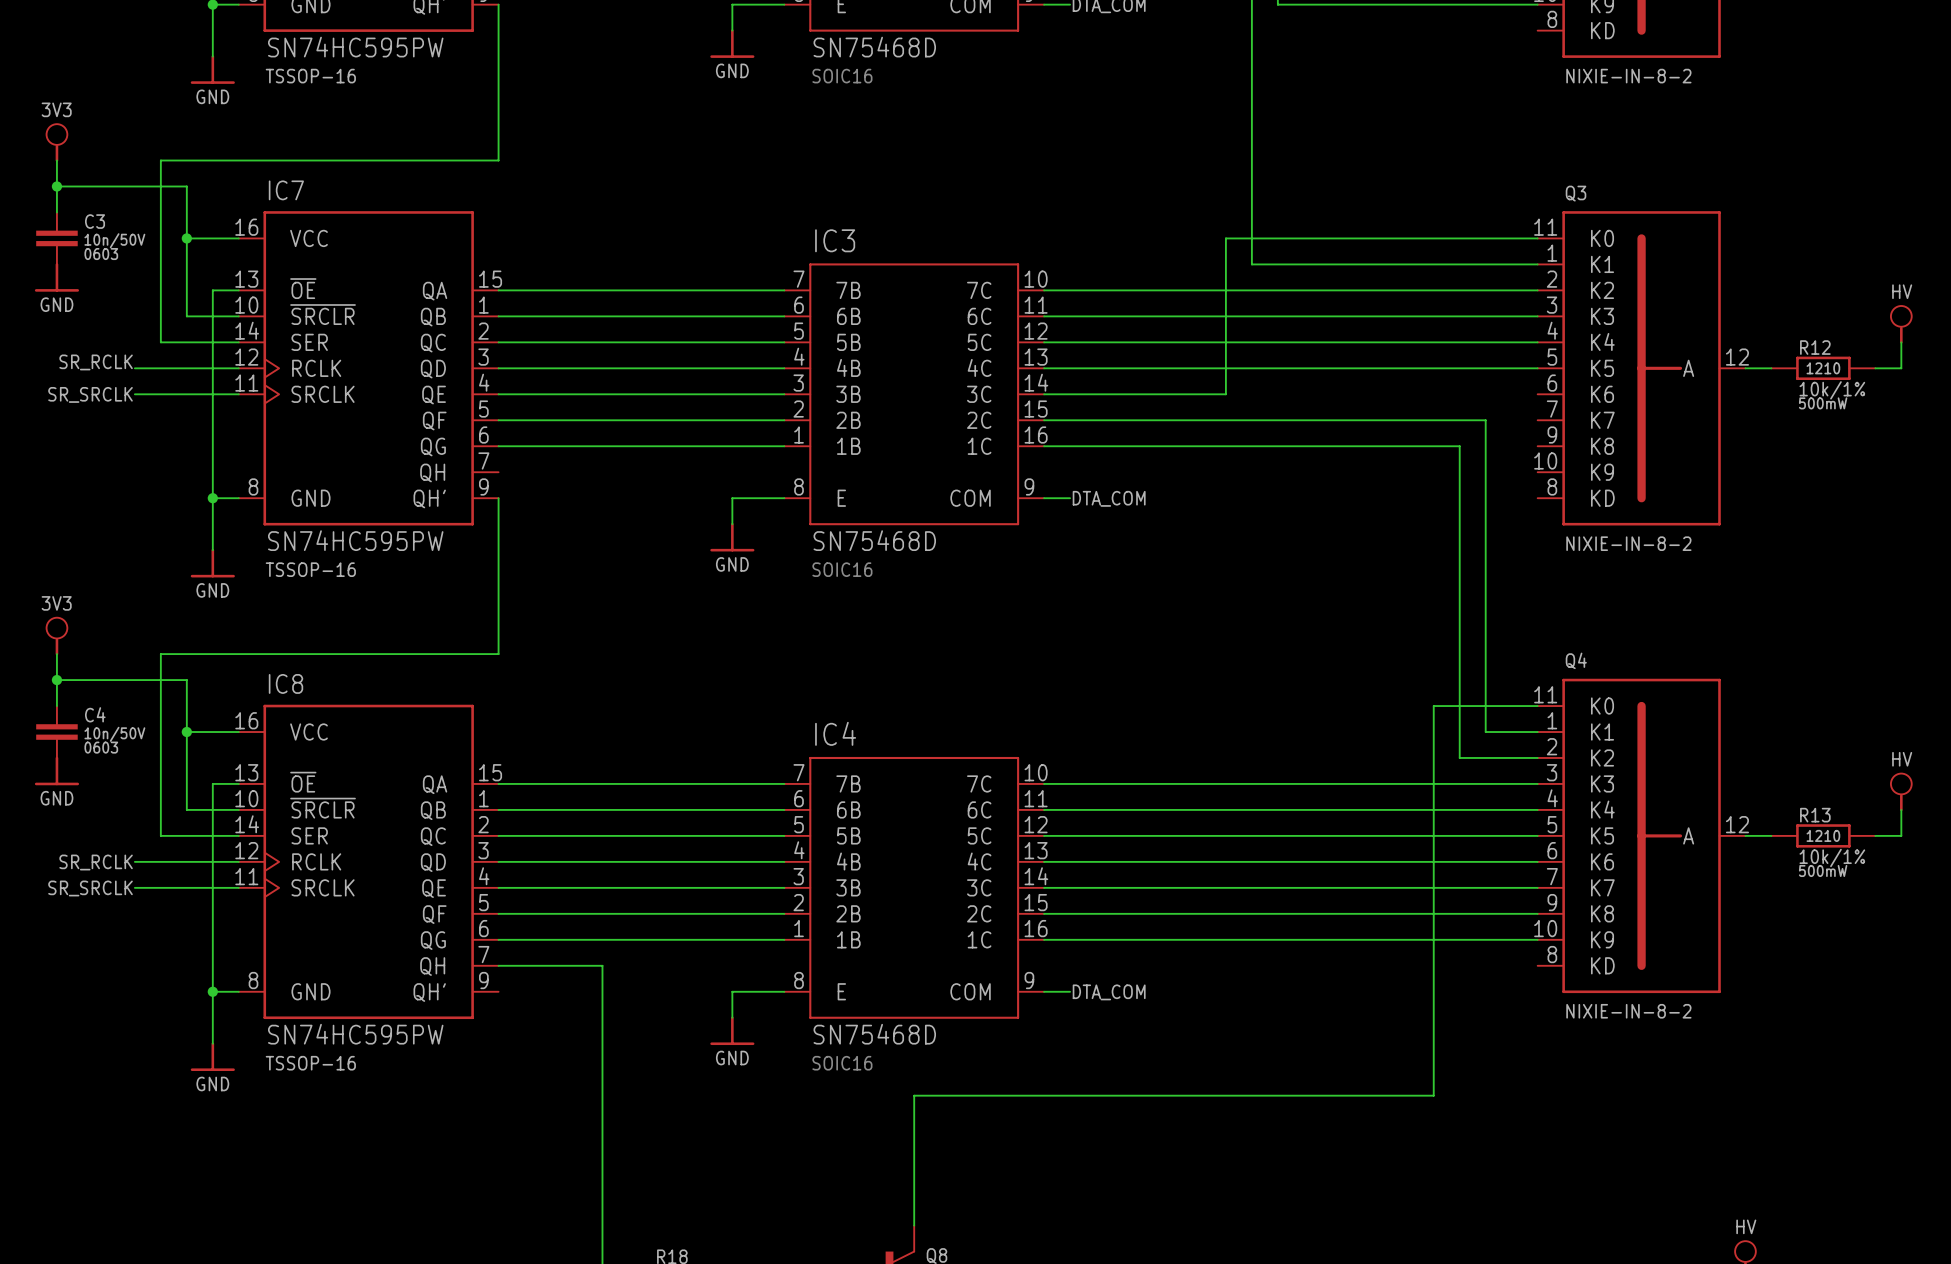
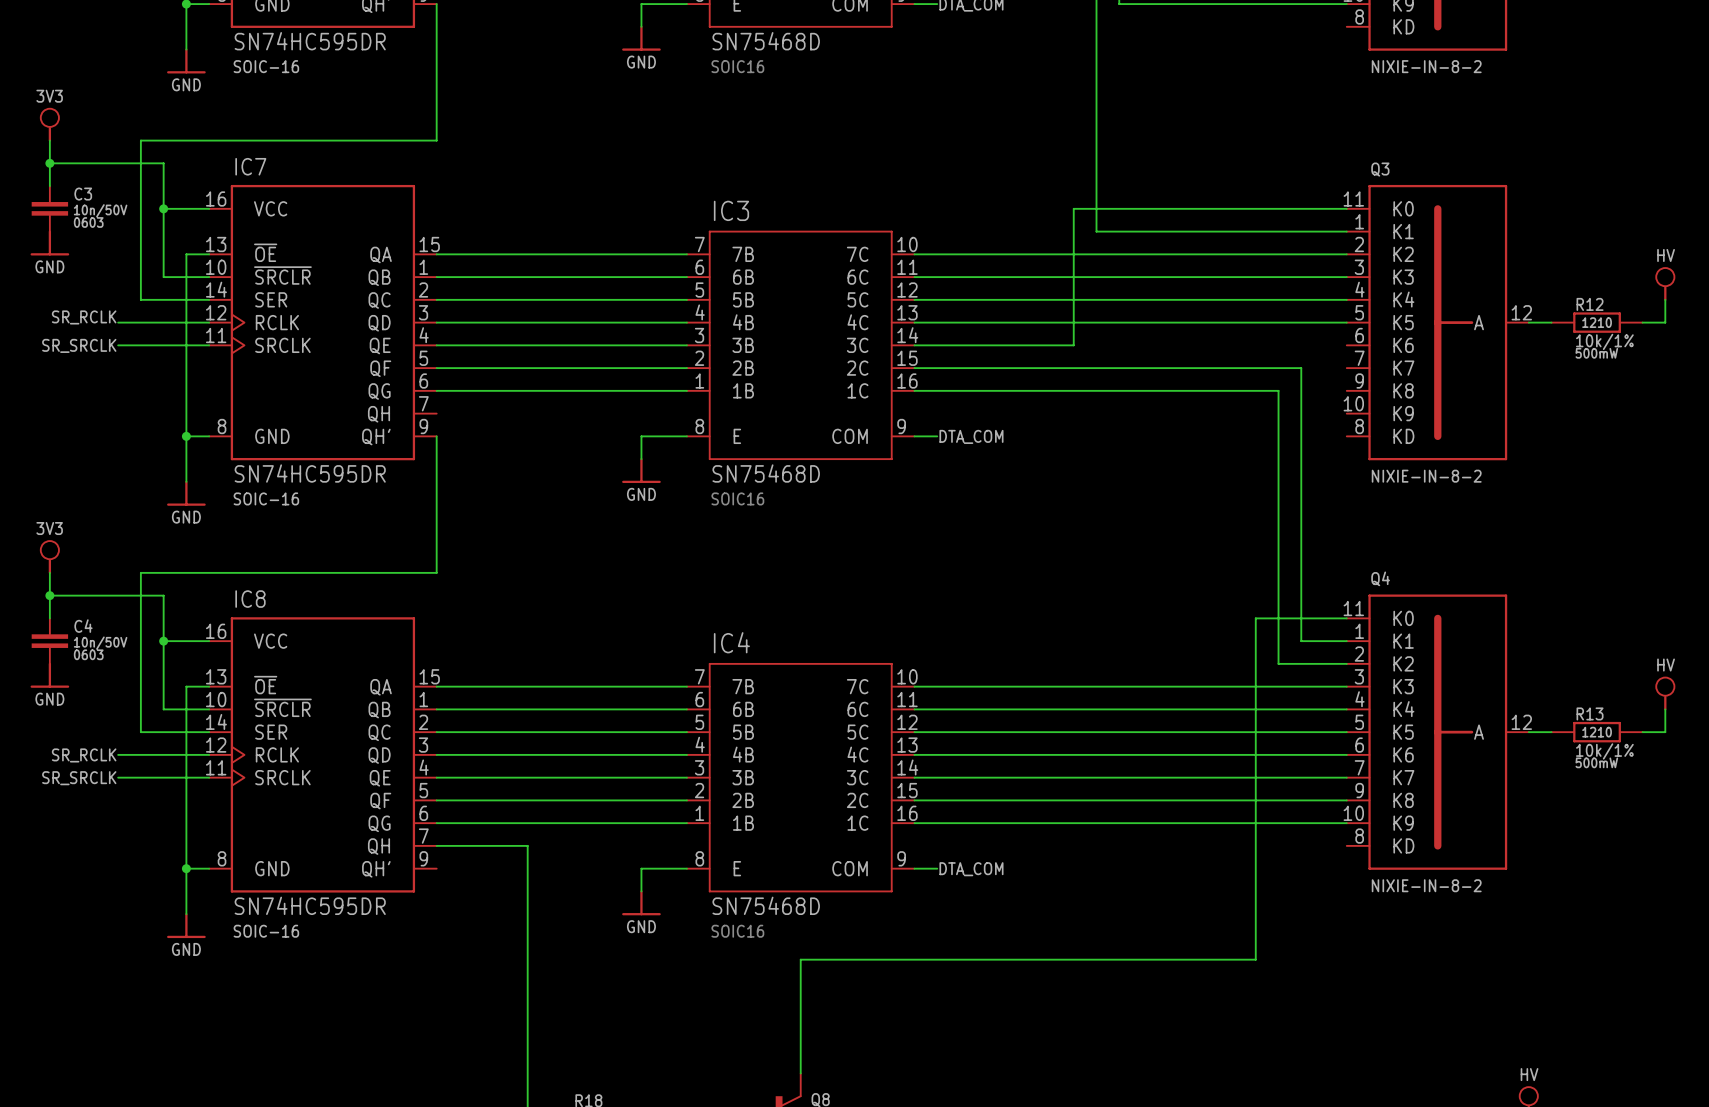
part value: SN74HC595PW (355, 47) -> SN74HC595DR (310, 41)
part text: TSSOP-16 (310, 76) -> SOIC-16 (266, 66)
IC7 value: SN74HC595PW (355, 540) -> SN74HC595DR (310, 473)
IC7 text: TSSOP-16 (310, 569) -> SOIC-16 (266, 498)
IC8 value: SN74HC595PW (355, 1034) -> SN74HC595DR (310, 905)
IC8 text: TSSOP-16 (310, 1063) -> SOIC-16 (266, 931)

